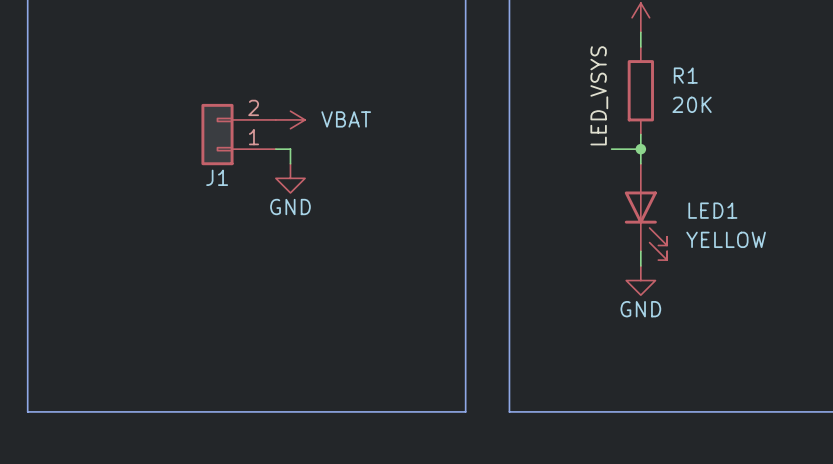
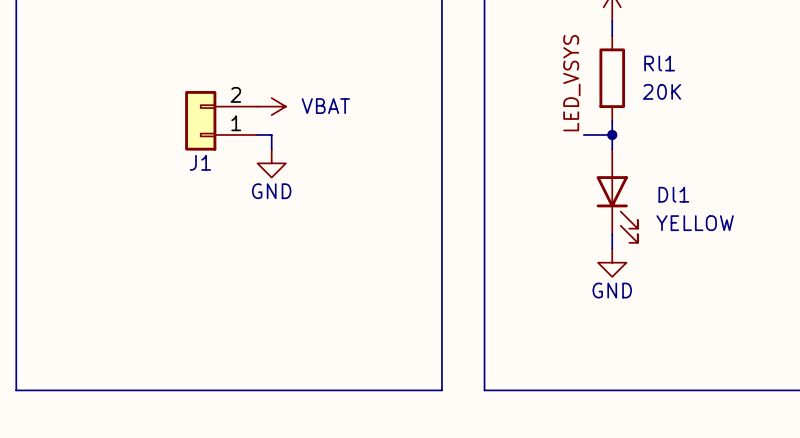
R1 name: R1 (685, 75) -> Rl1 (659, 63)
LED1 name: LED1 (712, 210) -> Dl1 (673, 194)

